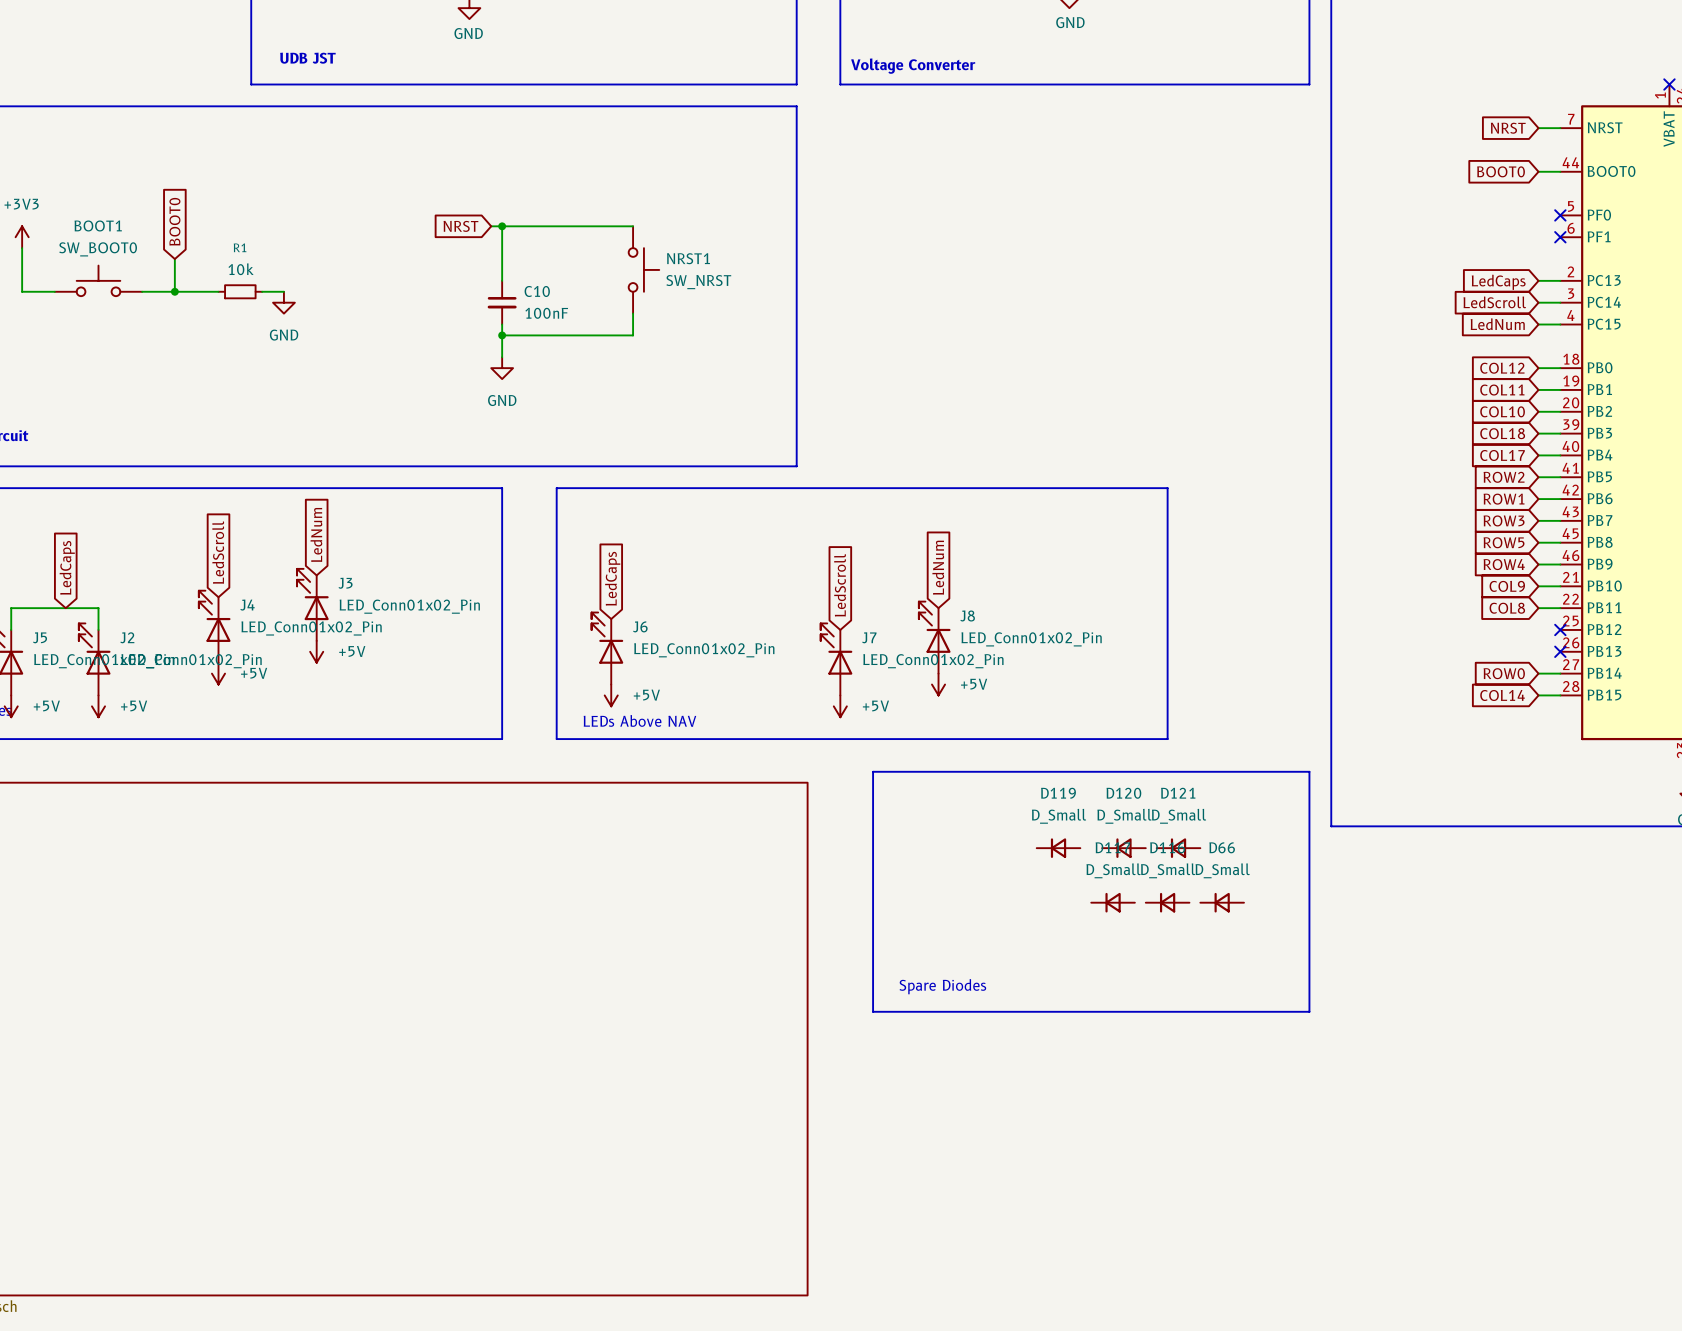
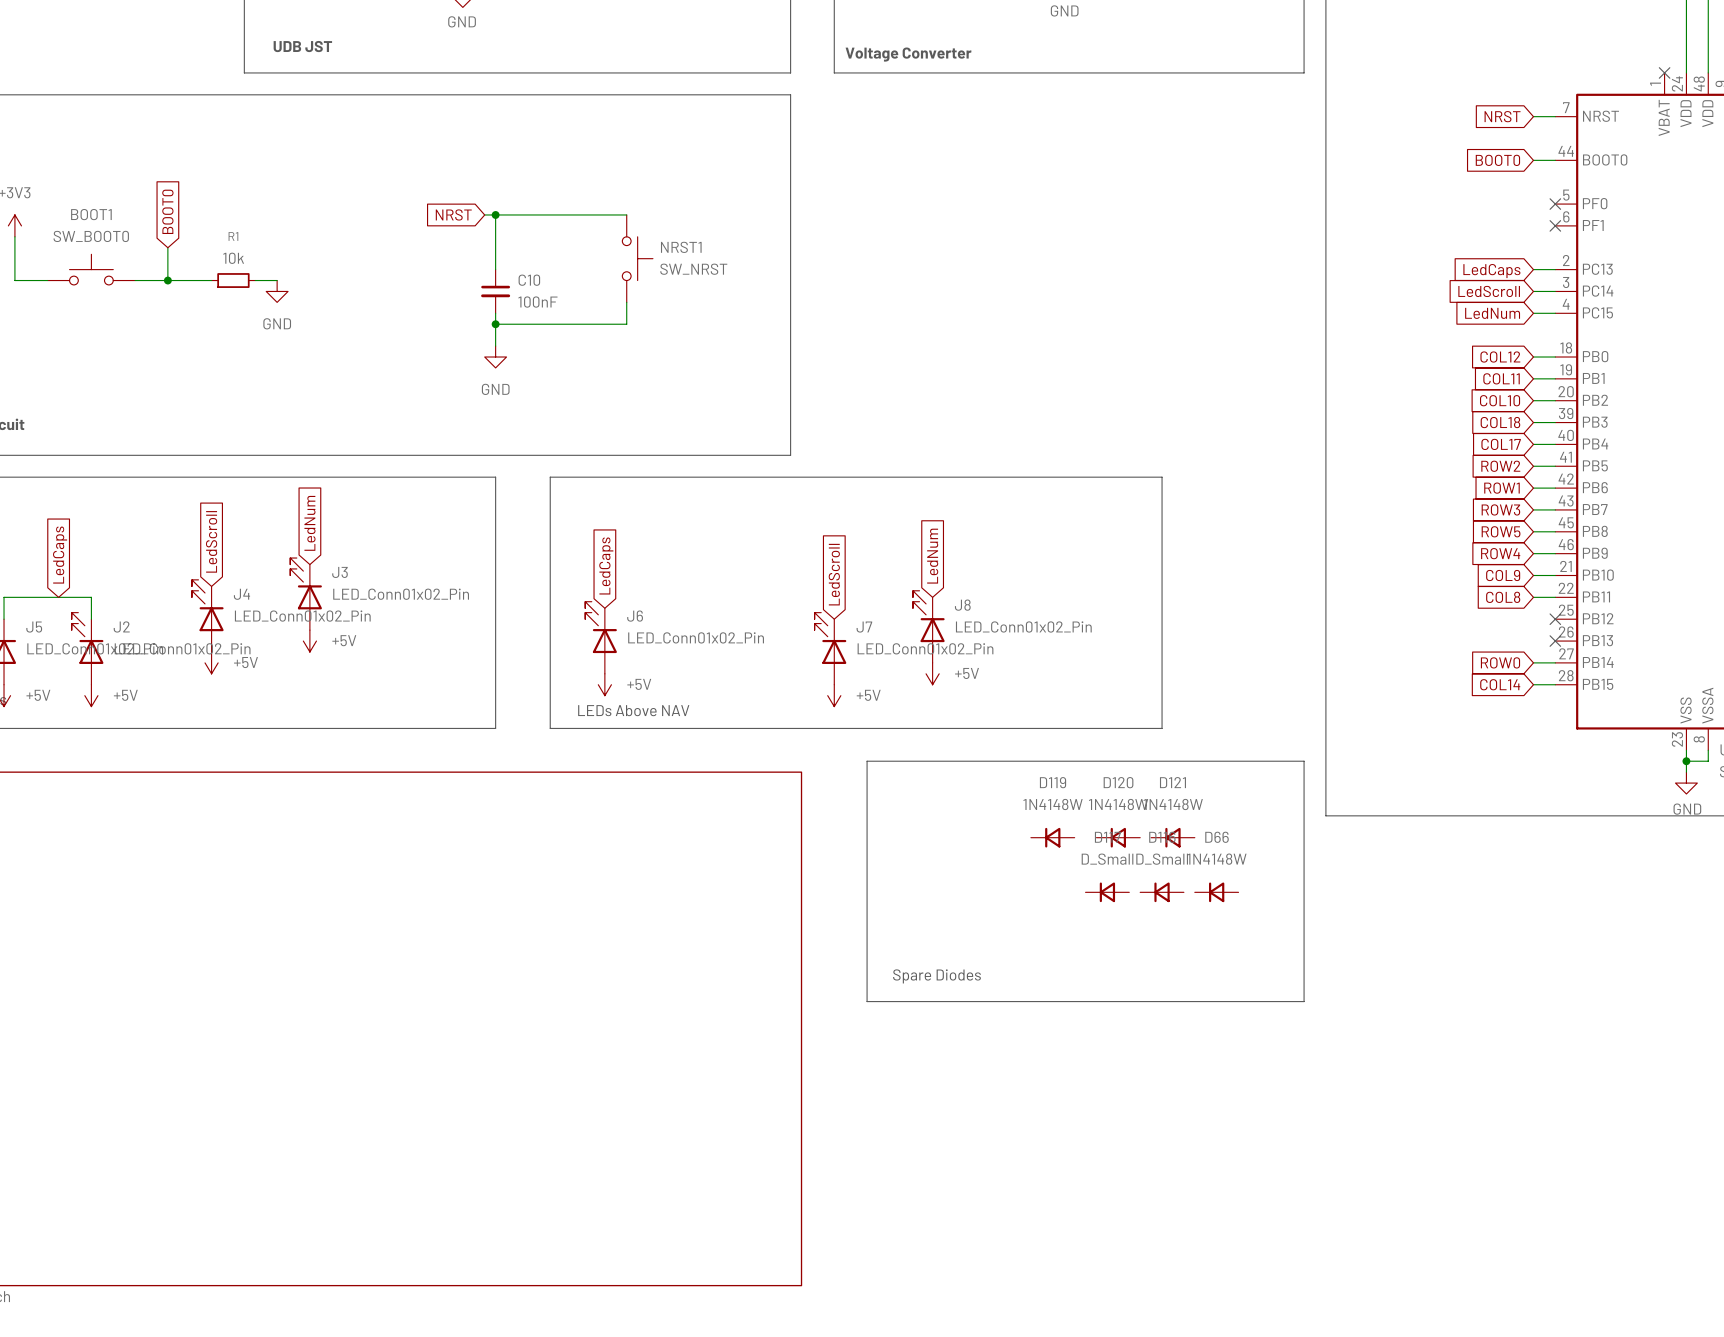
D119 value: D_Small (1059, 816) -> 1N4148W (1053, 804)
D120 value: D_Small (1124, 816) -> 1N4148W (1118, 804)
D121 value: D_Small (1179, 816) -> 1N4148W (1173, 804)
D66 value: D_Small (1222, 870) -> 1N4148W (1216, 859)

